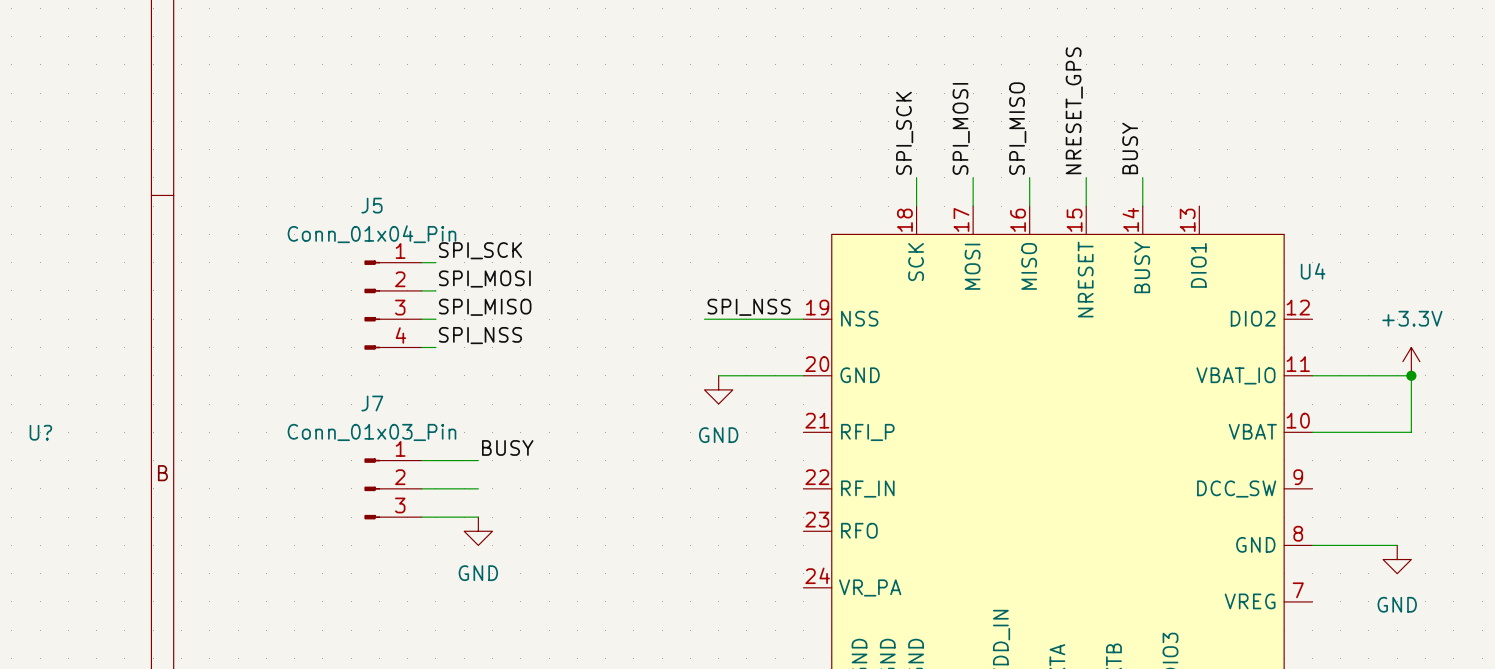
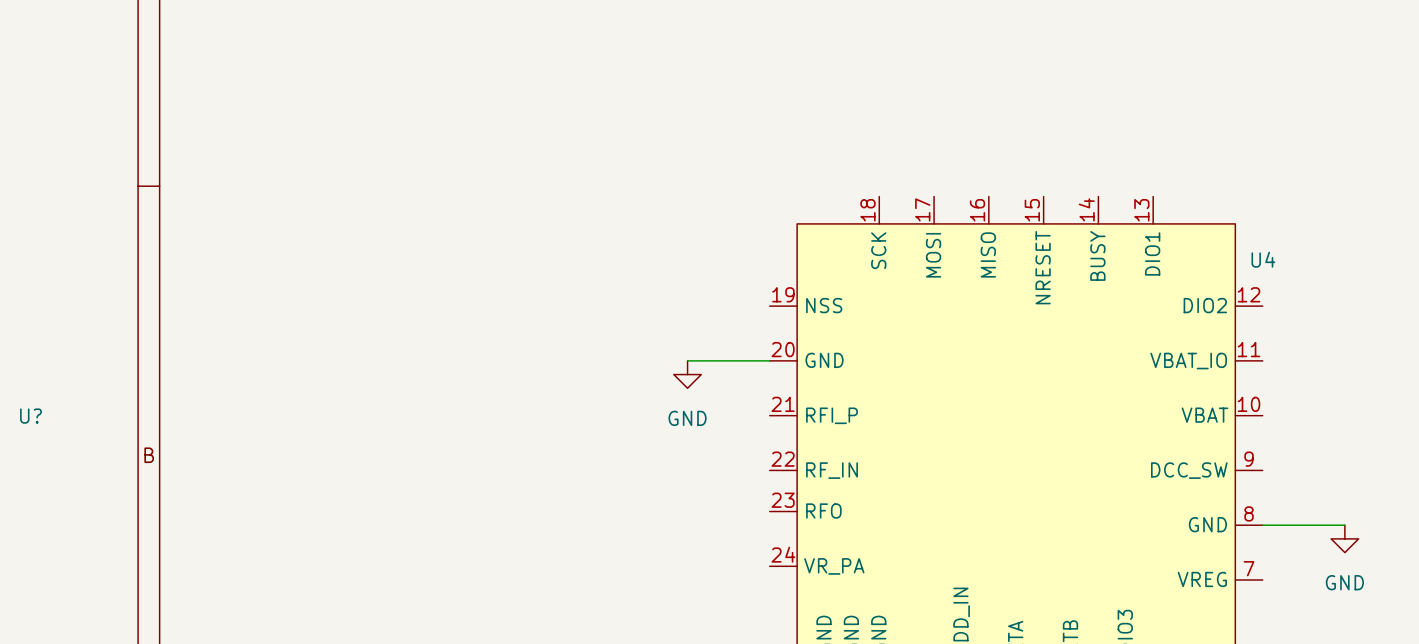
label: NRESET_GPS (1074, 110) -> none
label: SPI_MOSI (961, 128) -> none
label: SPI_MISO (1017, 128) -> none
label: SPI_SCK (904, 133) -> none
label: BUSY (1130, 148) -> none
wire: (916, 177) (916, 206) -> none
wire: (973, 177) (973, 206) -> none
wire: (1029, 177) (1029, 206) -> none
wire: (1086, 177) (1086, 206) -> none
wire: (1142, 177) (1142, 206) -> none
label: SPI_SCK (480, 250) -> none
wire: (421, 262) (435, 262) -> none
label: SPI_MOSI (484, 279) -> none
wire: (421, 290) (435, 290) -> none
J5: Conn_01x04_Pin (393, 305) -> none
label: SPI_MISO (485, 307) -> none
label: SPI_NSS (749, 307) -> none
wire: (421, 319) (435, 319) -> none
wire: (704, 319) (803, 319) -> none
label: SPI_NSS (480, 335) -> none
wire: (421, 347) (435, 347) -> none
power symbol: +3.3V (1411, 361) -> none
wire: (1312, 375) (1411, 375) (1411, 432) (1312, 432) -> none
junction: (1411, 375) -> none
label: BUSY (507, 447) -> none
wire: (421, 460) (478, 460) -> none
J7: Conn_01x03_Pin (393, 488) -> none
wire: (421, 488) (478, 488) -> none
wire: (421, 517) (478, 517) -> none
power symbol: GND (478, 531) -> none

